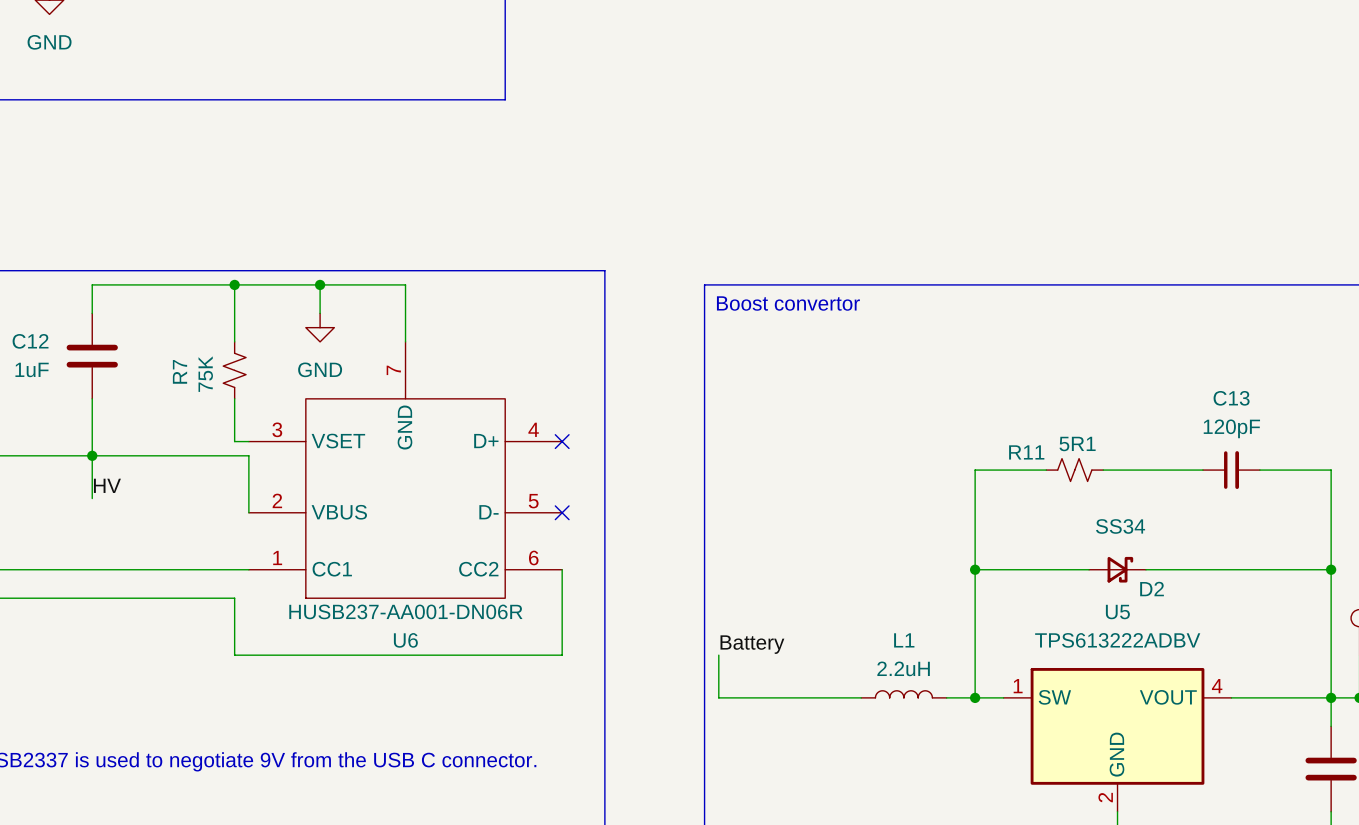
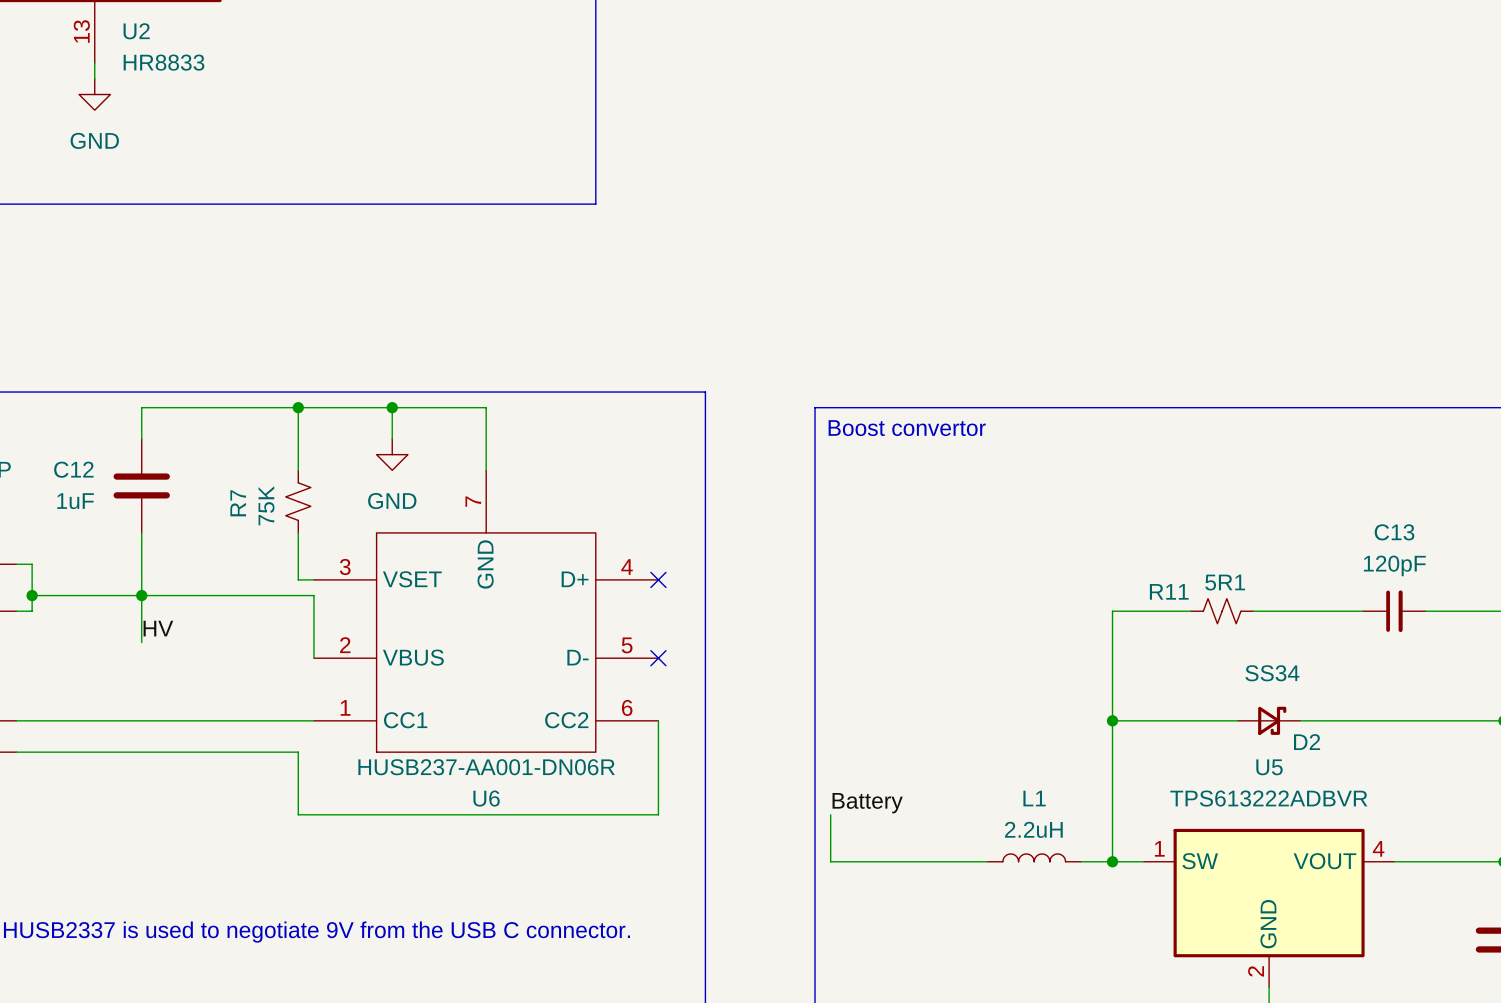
U5 value: TPS613222ADBV (1117, 640) -> TPS613222ADBVR (1268, 798)

